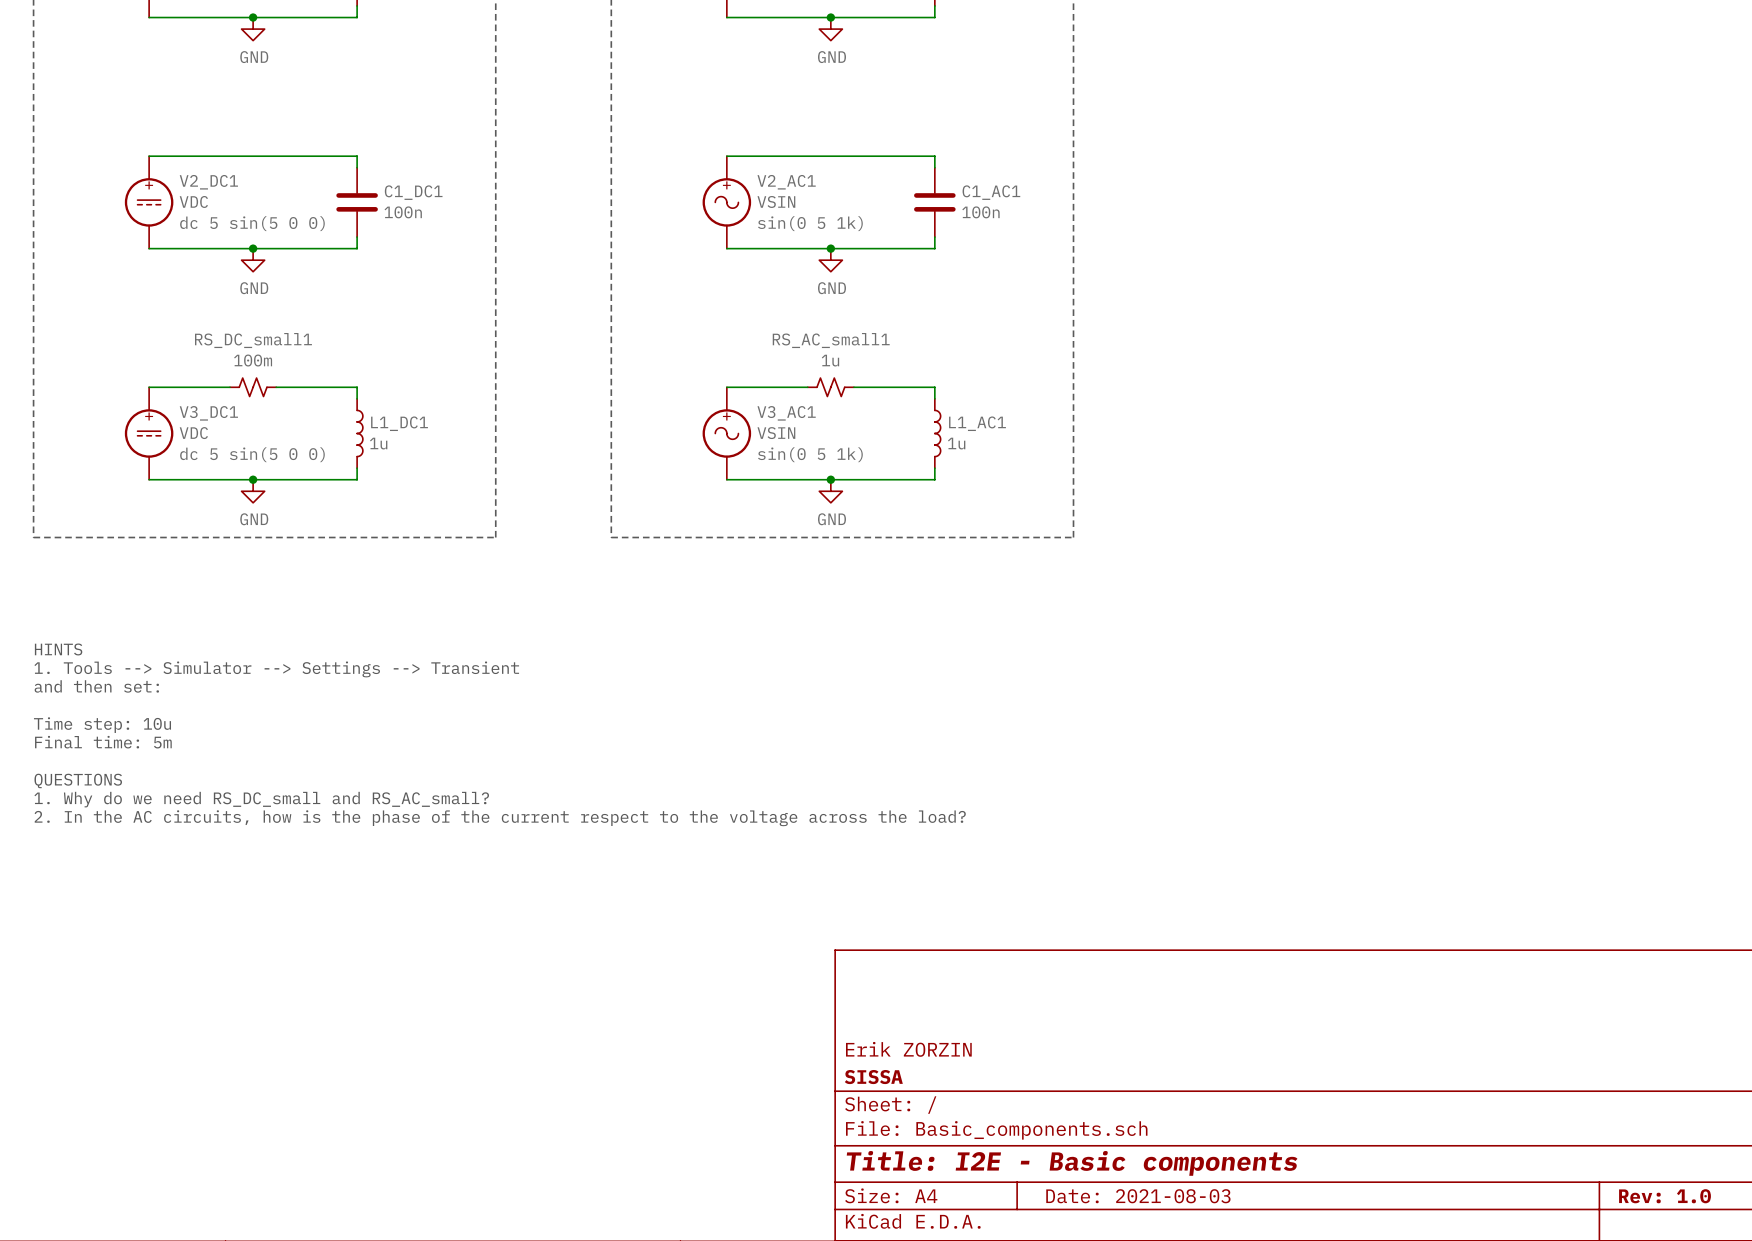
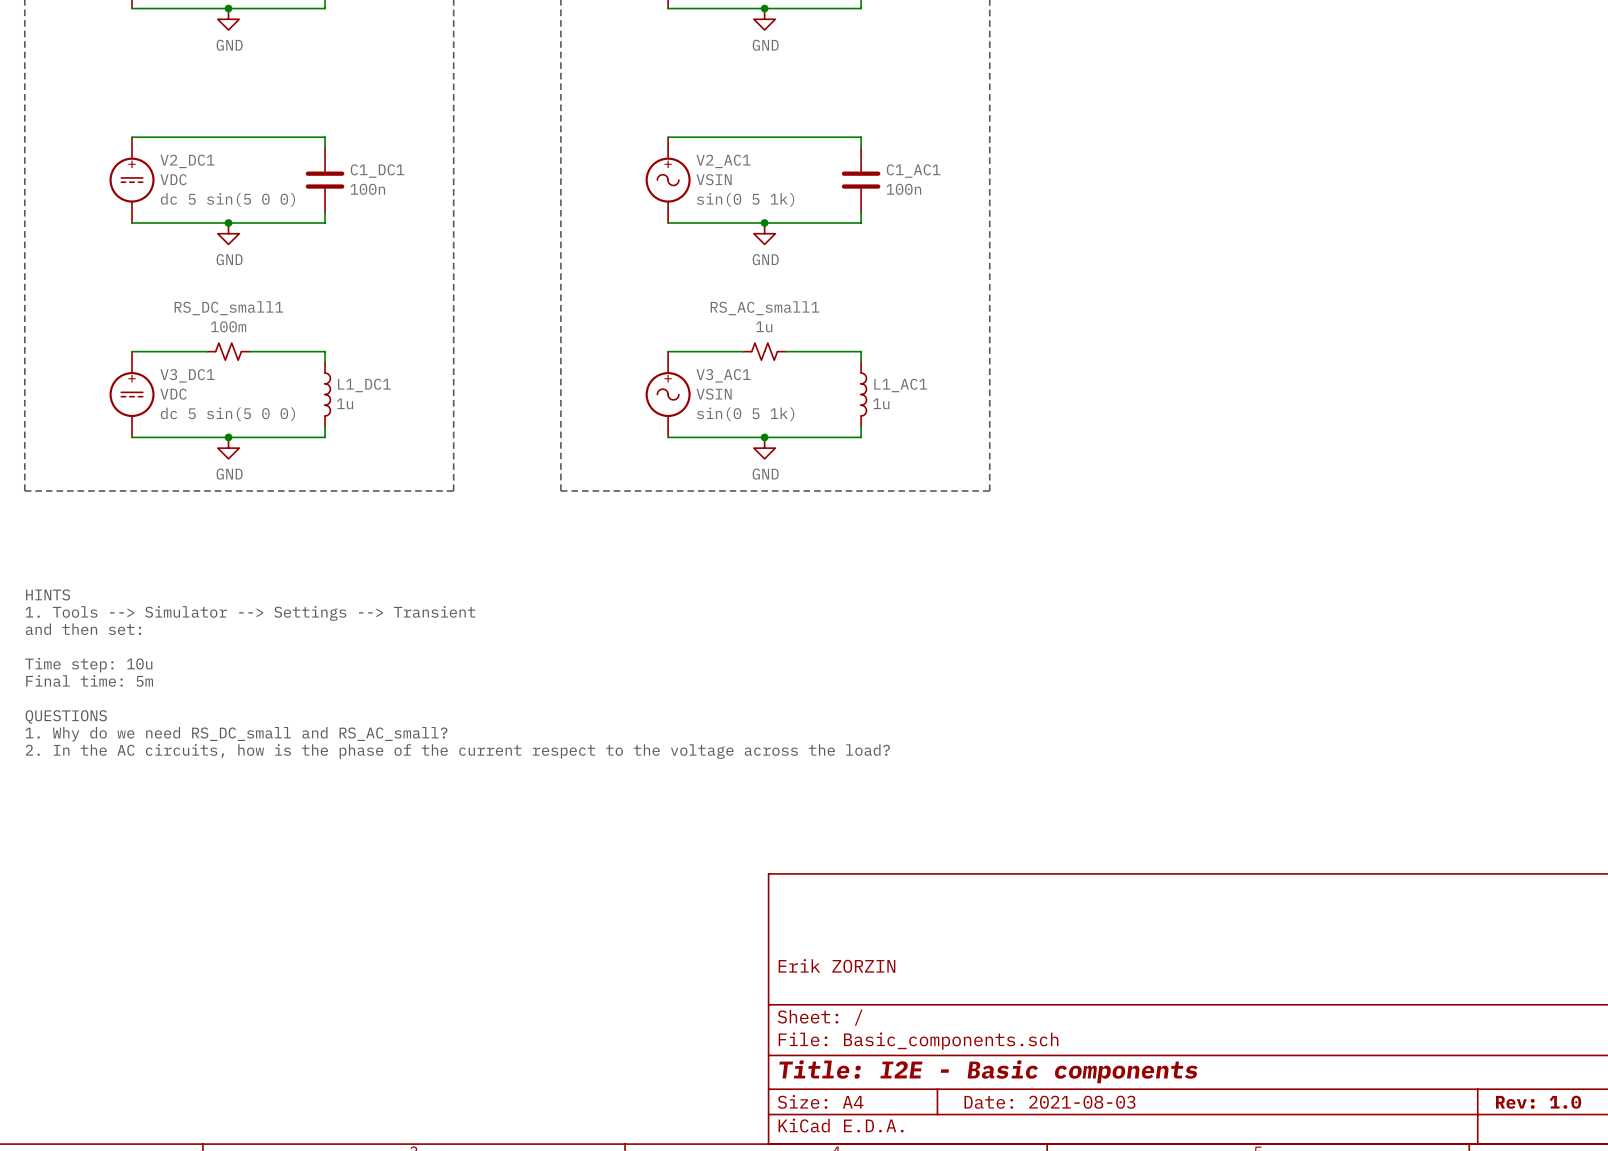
title block: SISSA (873, 1077) -> none

